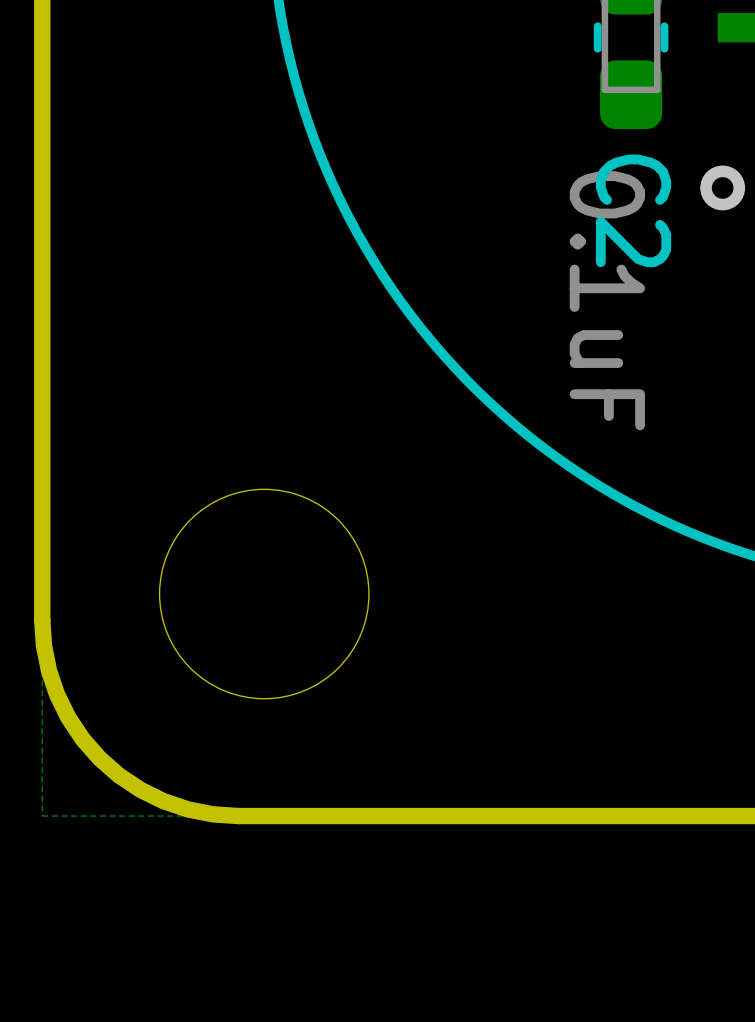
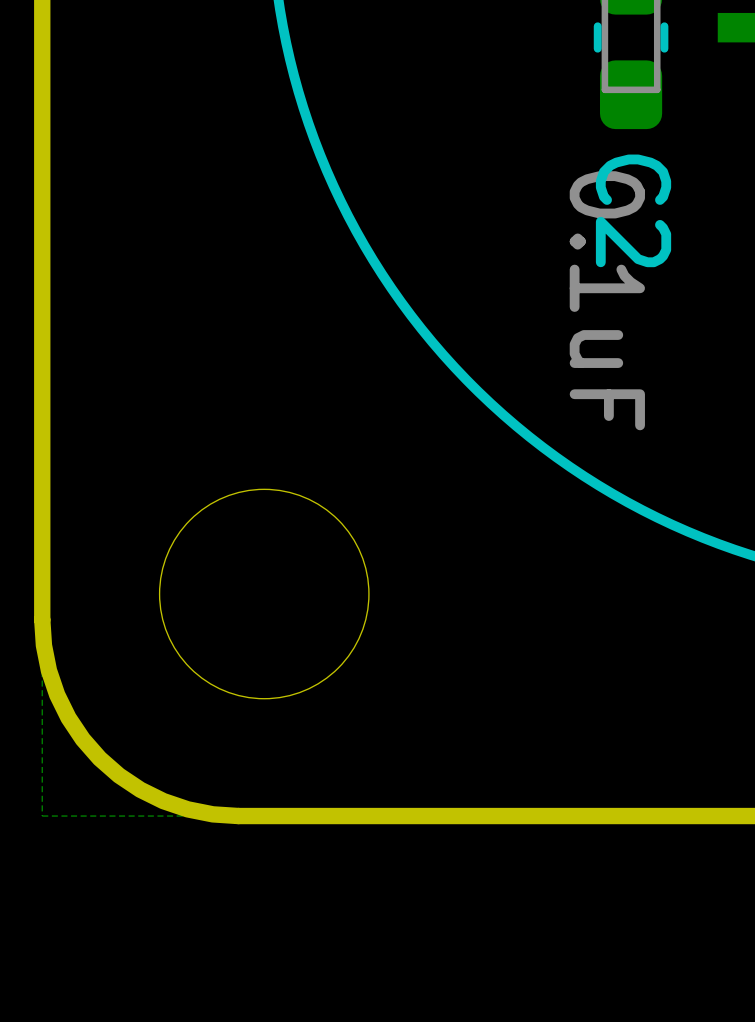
via: (722, 187) -> none

